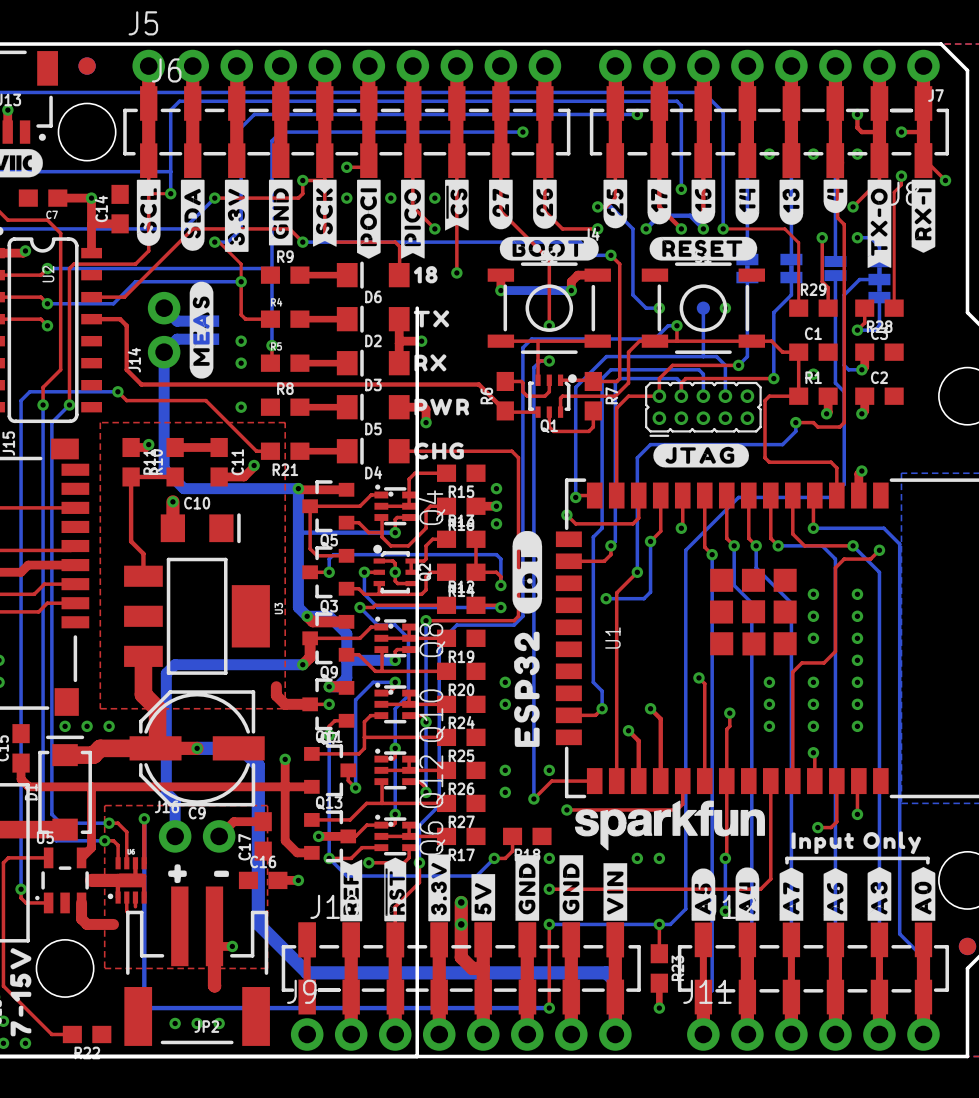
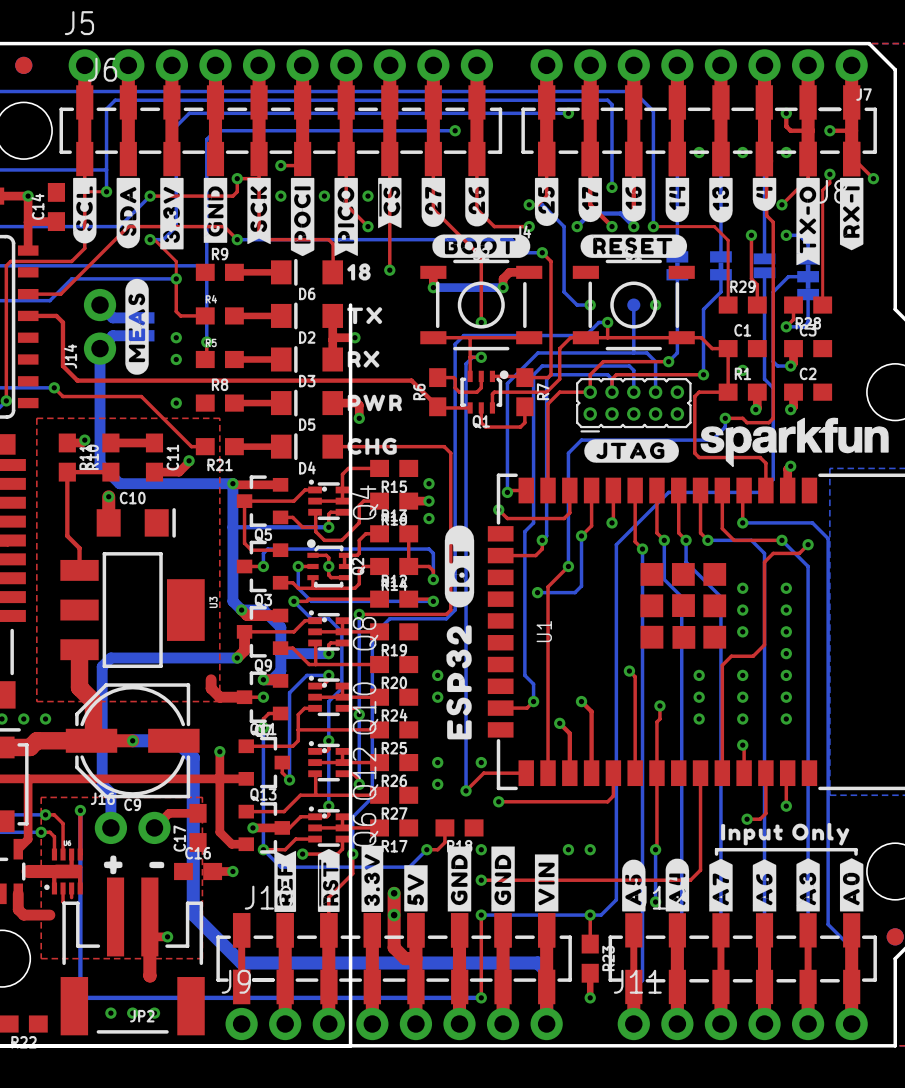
drawing position: (669, 825) -> (794, 442)

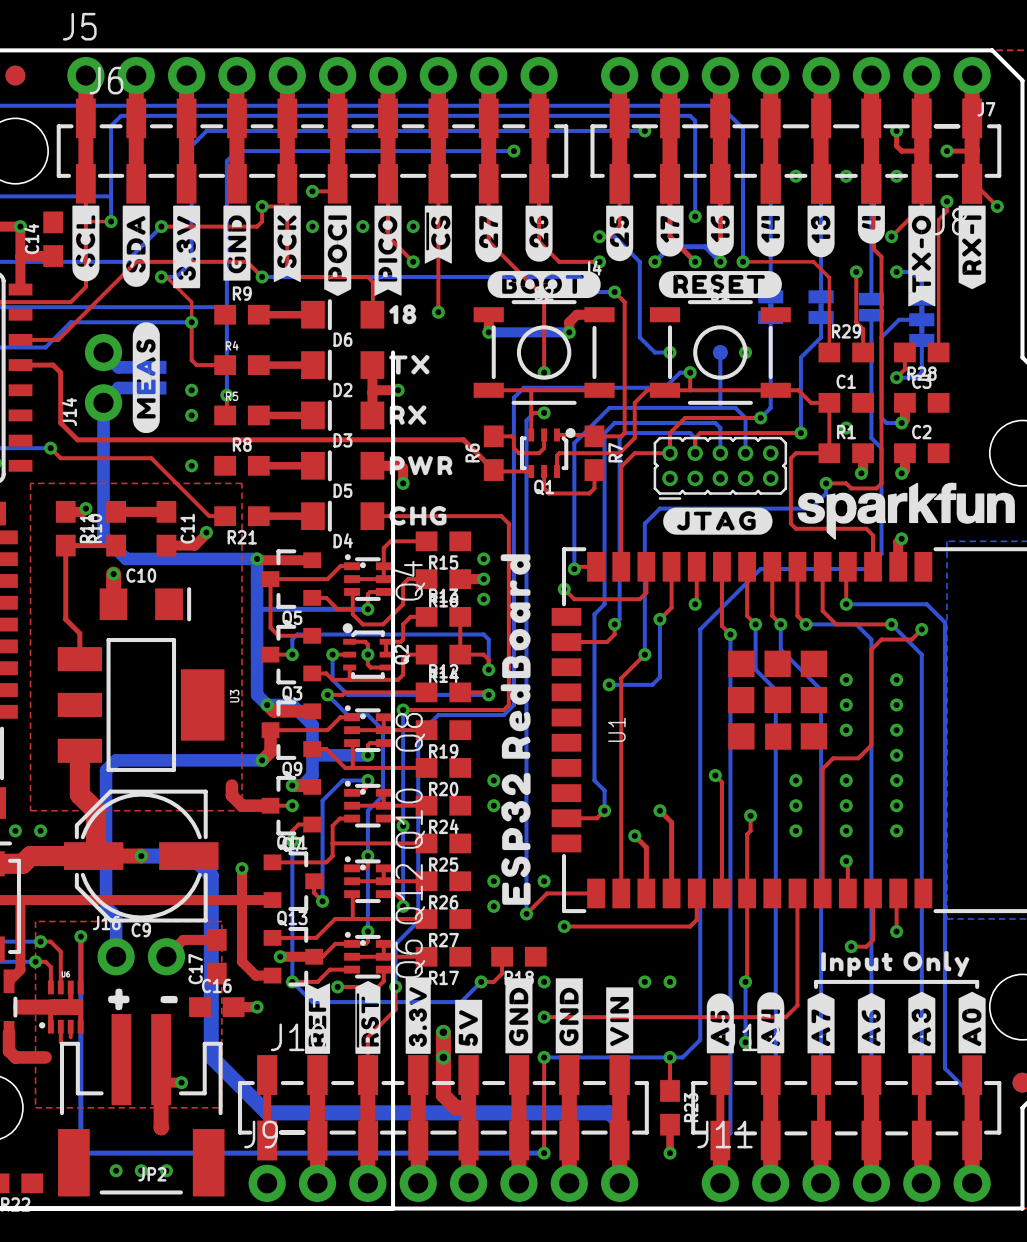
drawing shape: [444, 525, 475, 608] -> [500, 554, 531, 759]
drawing position: (459, 682) -> (515, 838)

